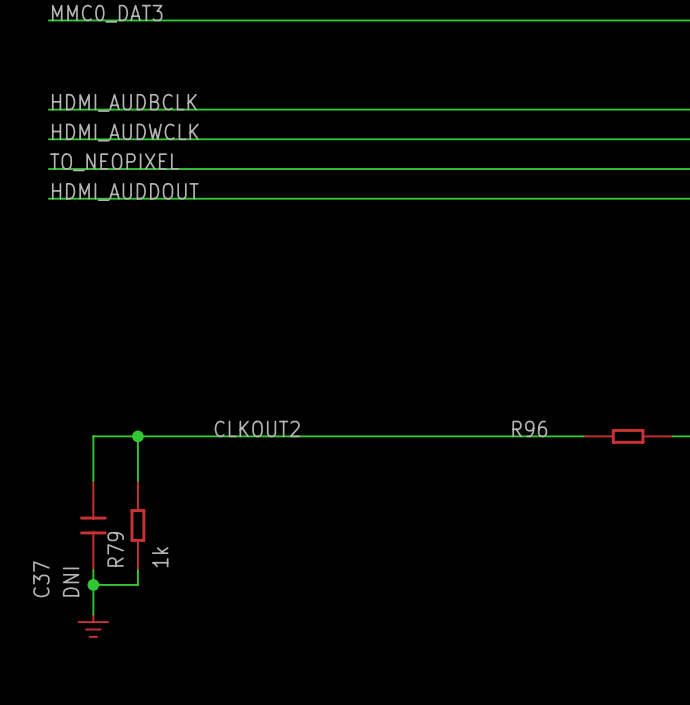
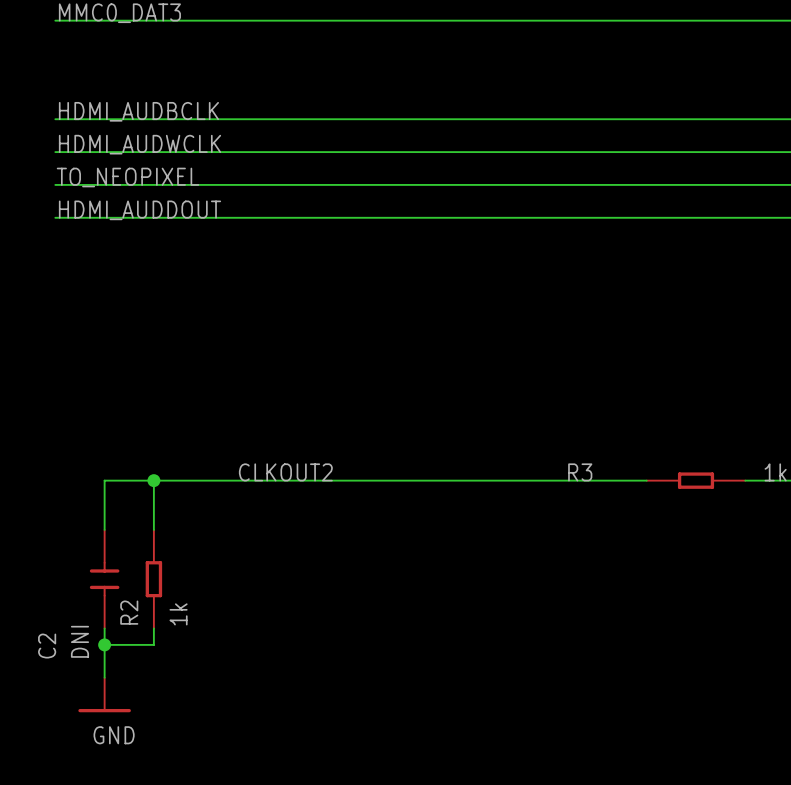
R96 name: R96 (529, 428) -> R3 (580, 472)
R79 name: R79 (115, 549) -> R2 (129, 612)
C37 name: C37 (41, 579) -> C2 (47, 646)
power symbol shape: [77, 613, 110, 638] -> [78, 677, 131, 713]
power symbol text: none -> GND (114, 735)

